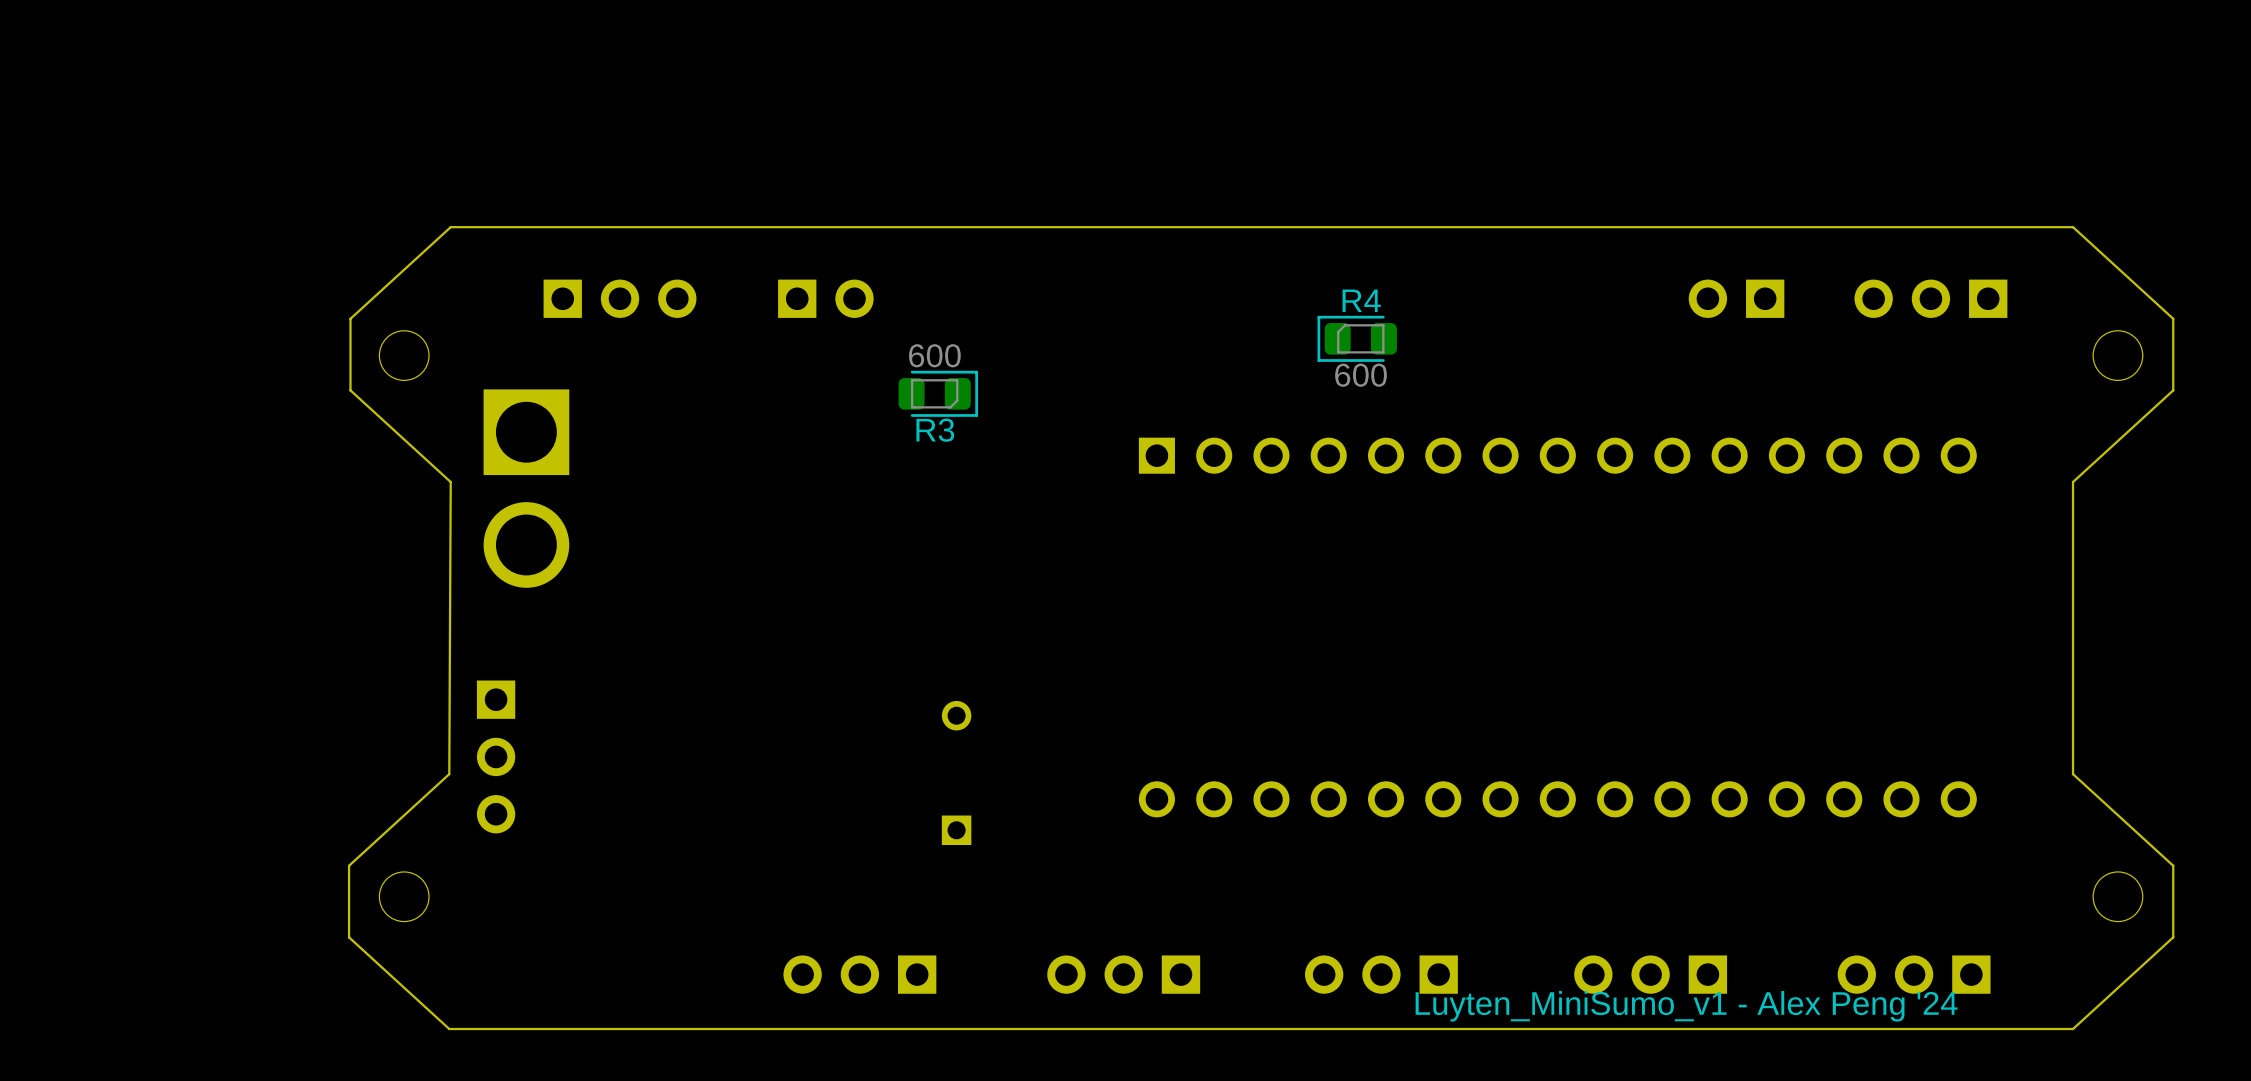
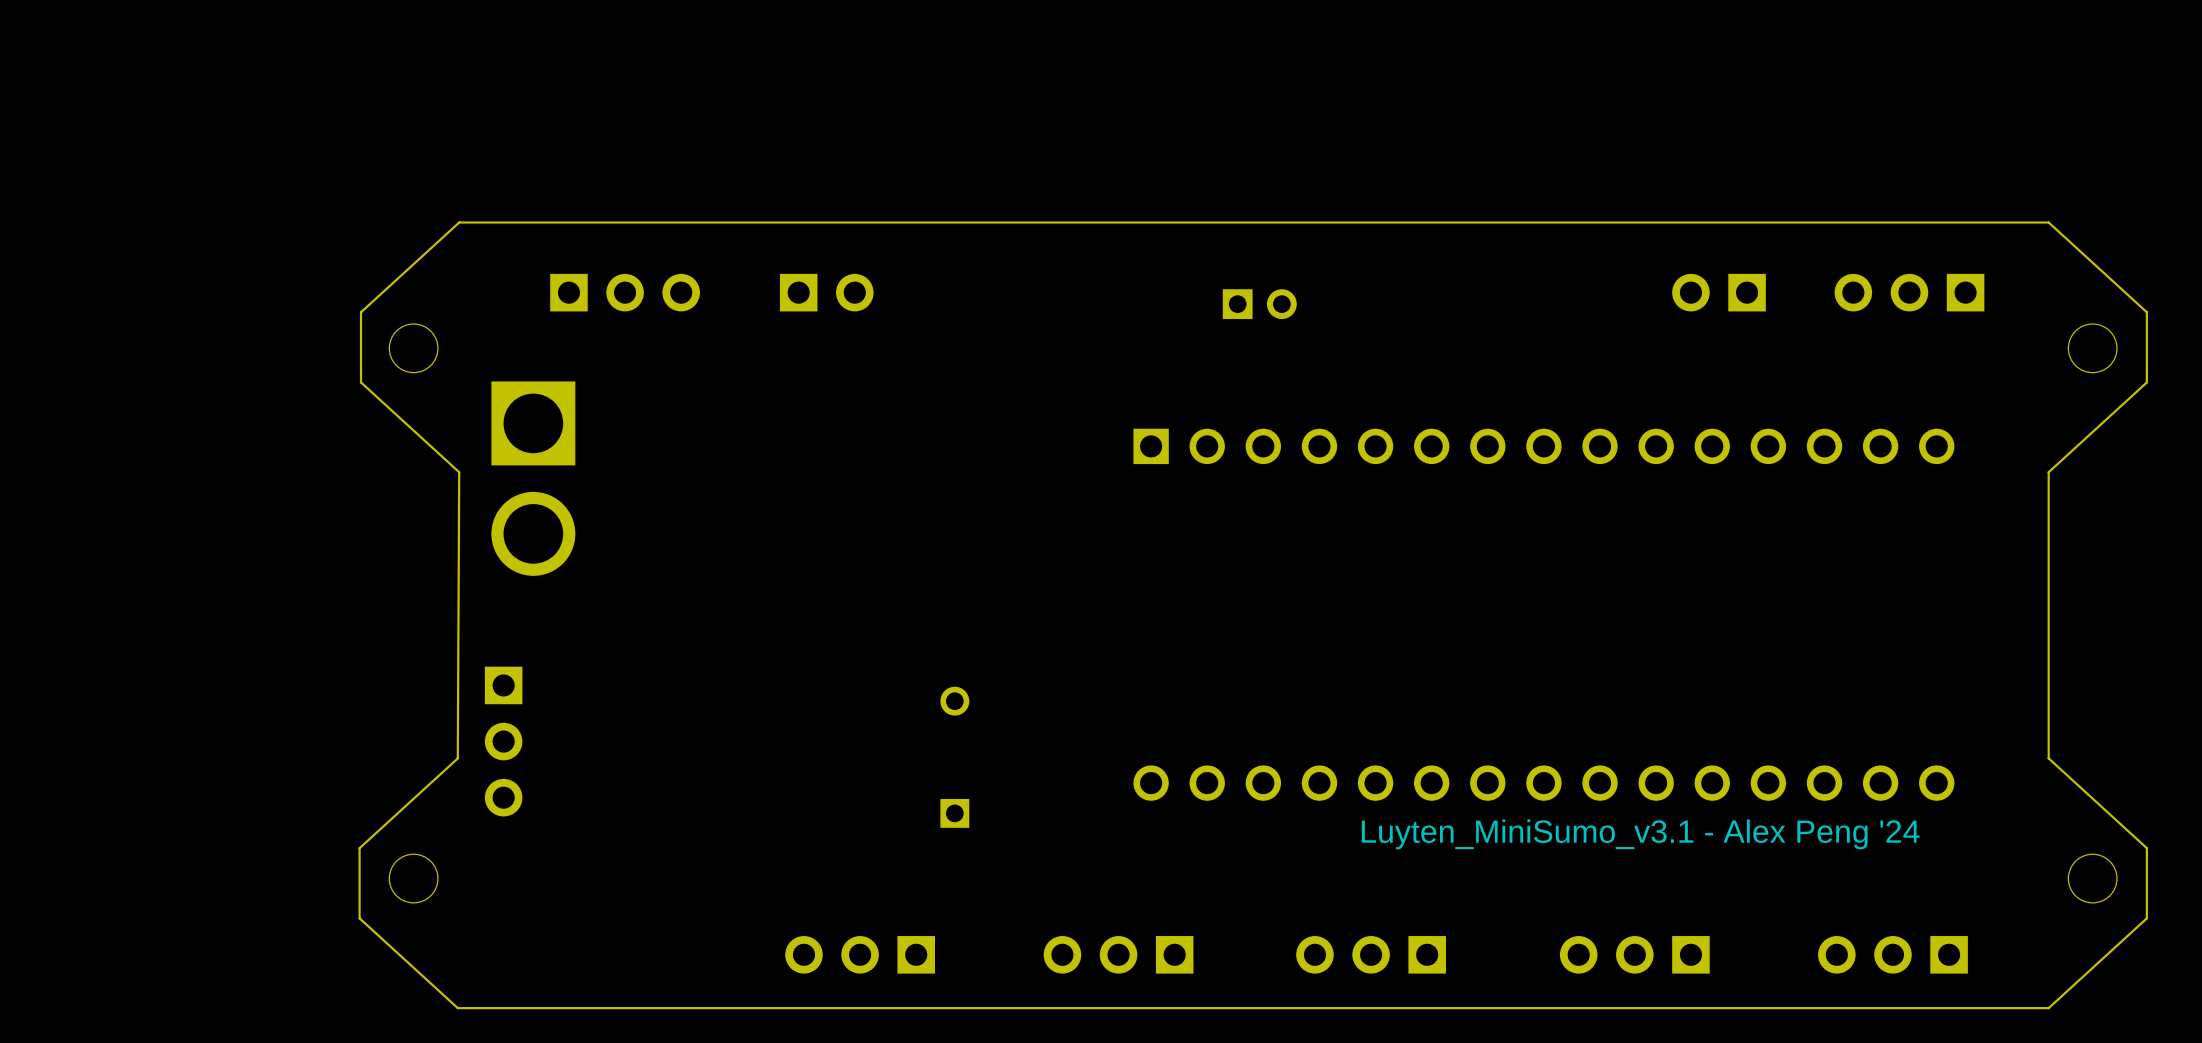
part: none -> (1259, 304)
R4: 600 (1357, 338) -> none
R3: 600 (938, 393) -> none
text: none -> Luyten_MiniSumo_v3.1 - Alex Peng '24 (1640, 834)
text: Luyten_MiniSumo_v1 - Alex Peng '24 (1686, 1006) -> none

